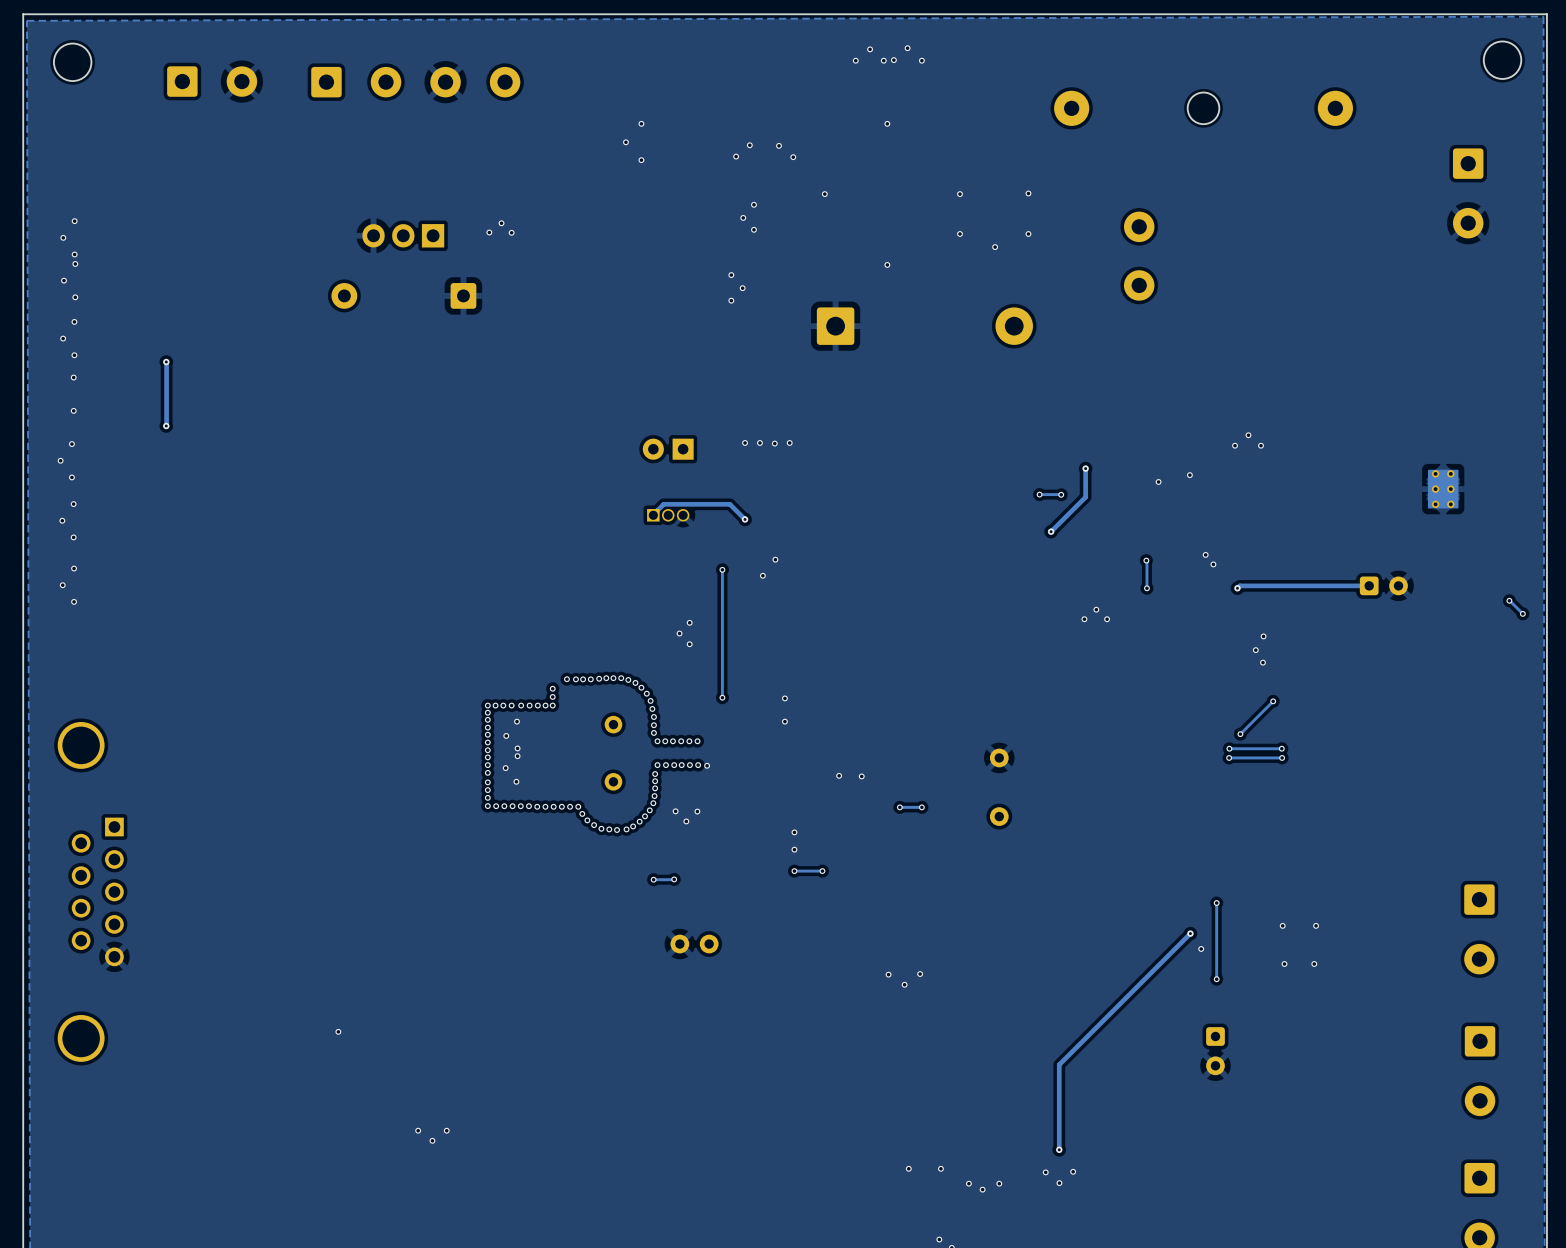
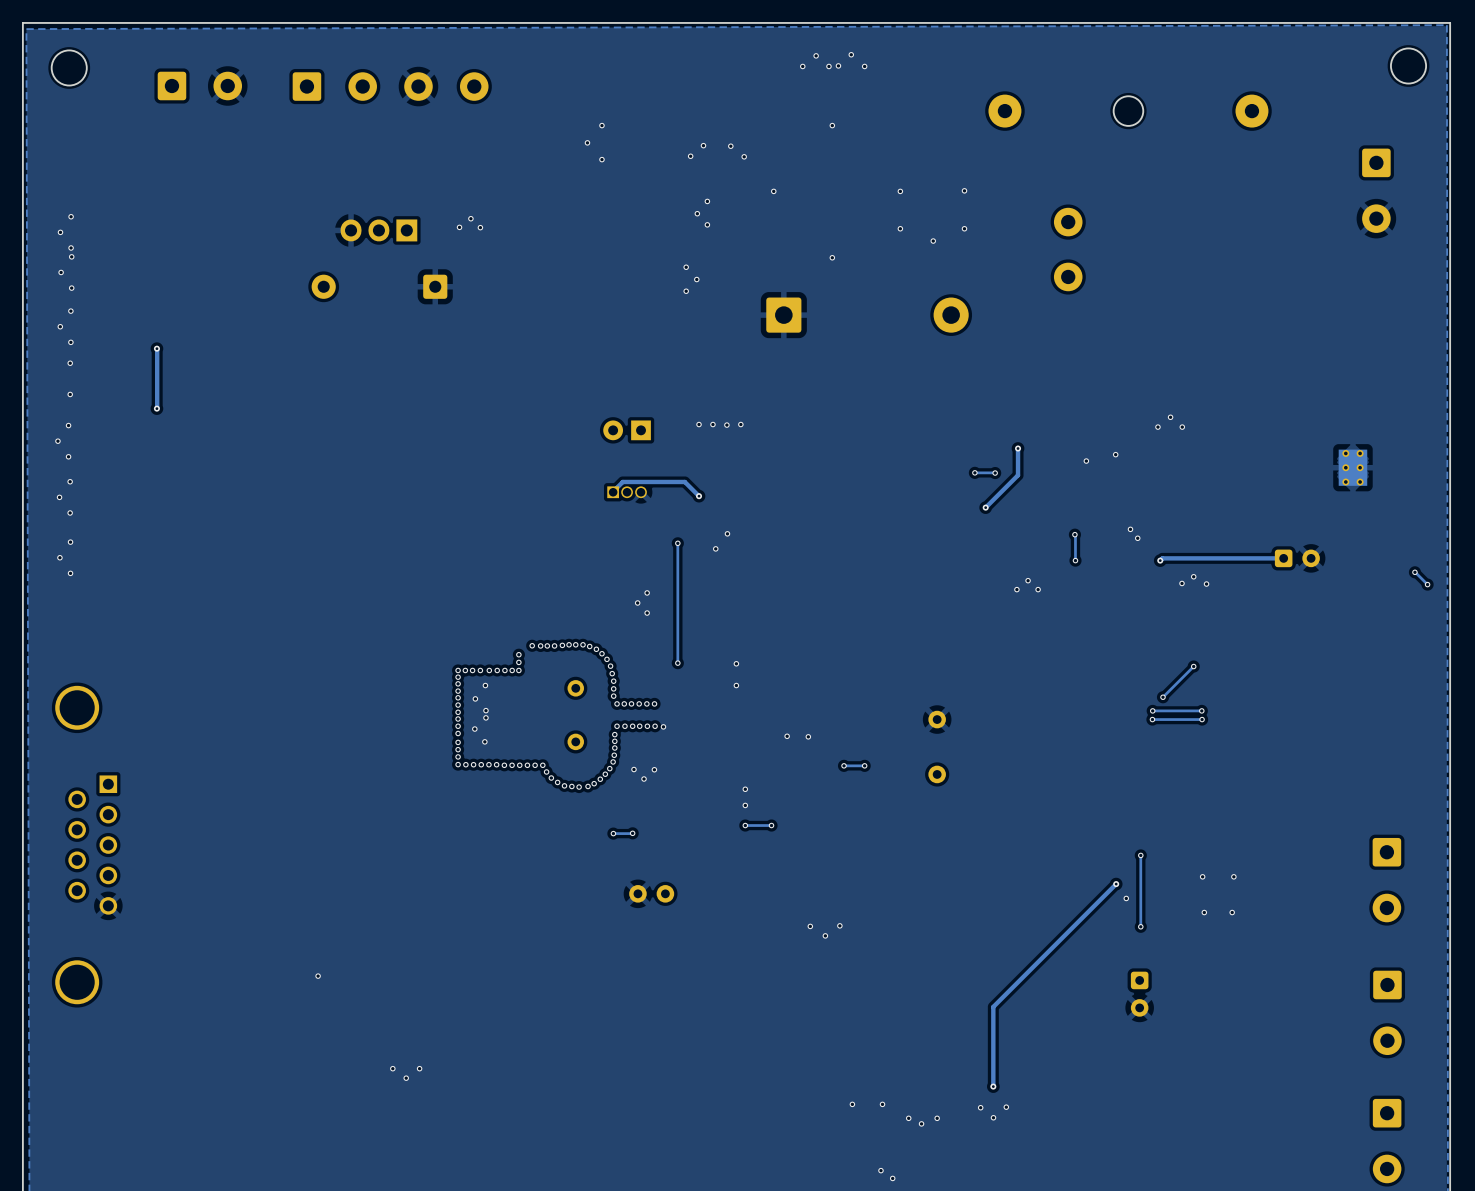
via: none -> (1193, 576)
via: none -> (1182, 583)
via: none -> (1206, 584)
via: (1263, 636) -> none
via: (1255, 650) -> none
via: (1262, 662) -> none
via: (888, 974) -> none
via: (920, 974) -> none
via: none -> (810, 926)
via: none -> (839, 925)
via: (904, 984) -> none
via: none -> (825, 935)

